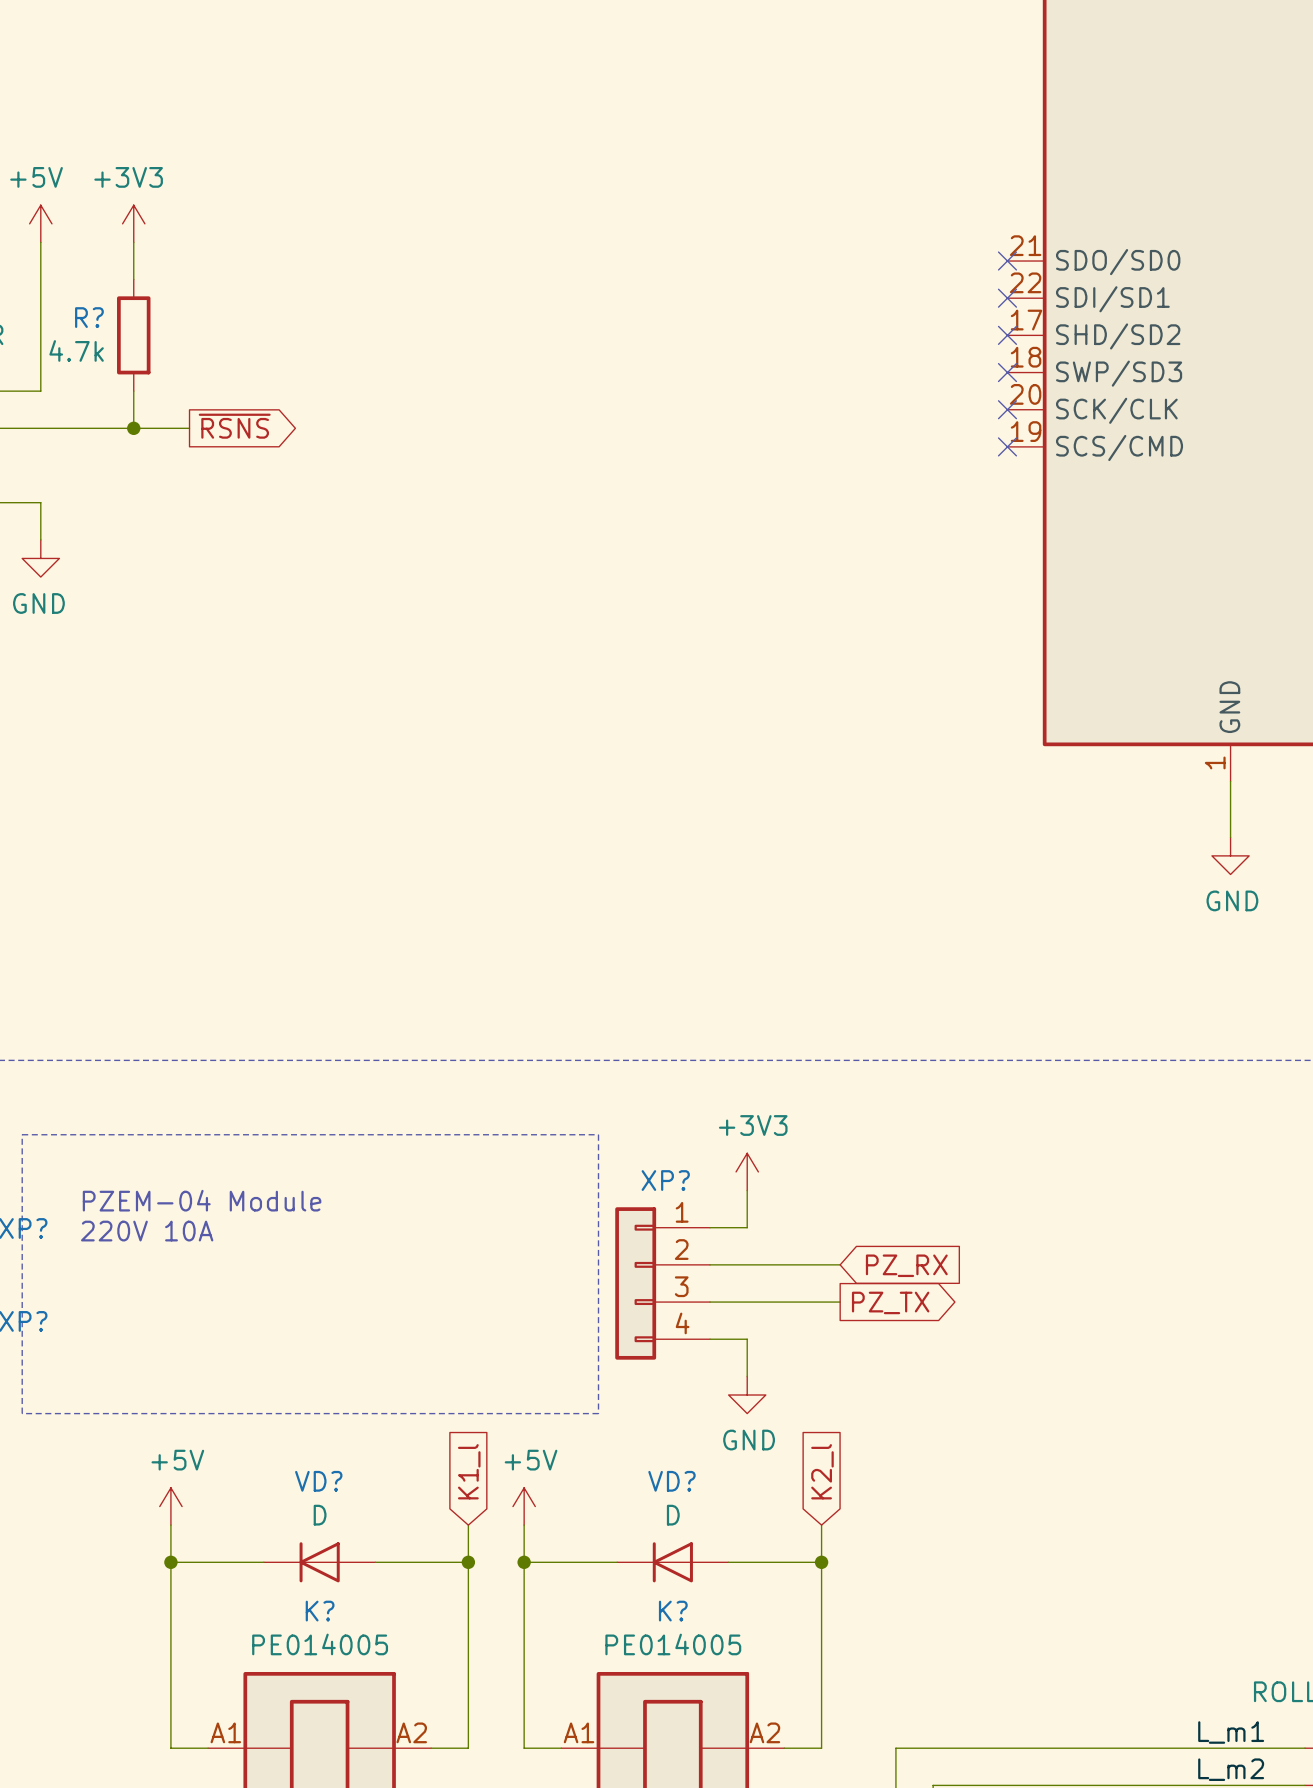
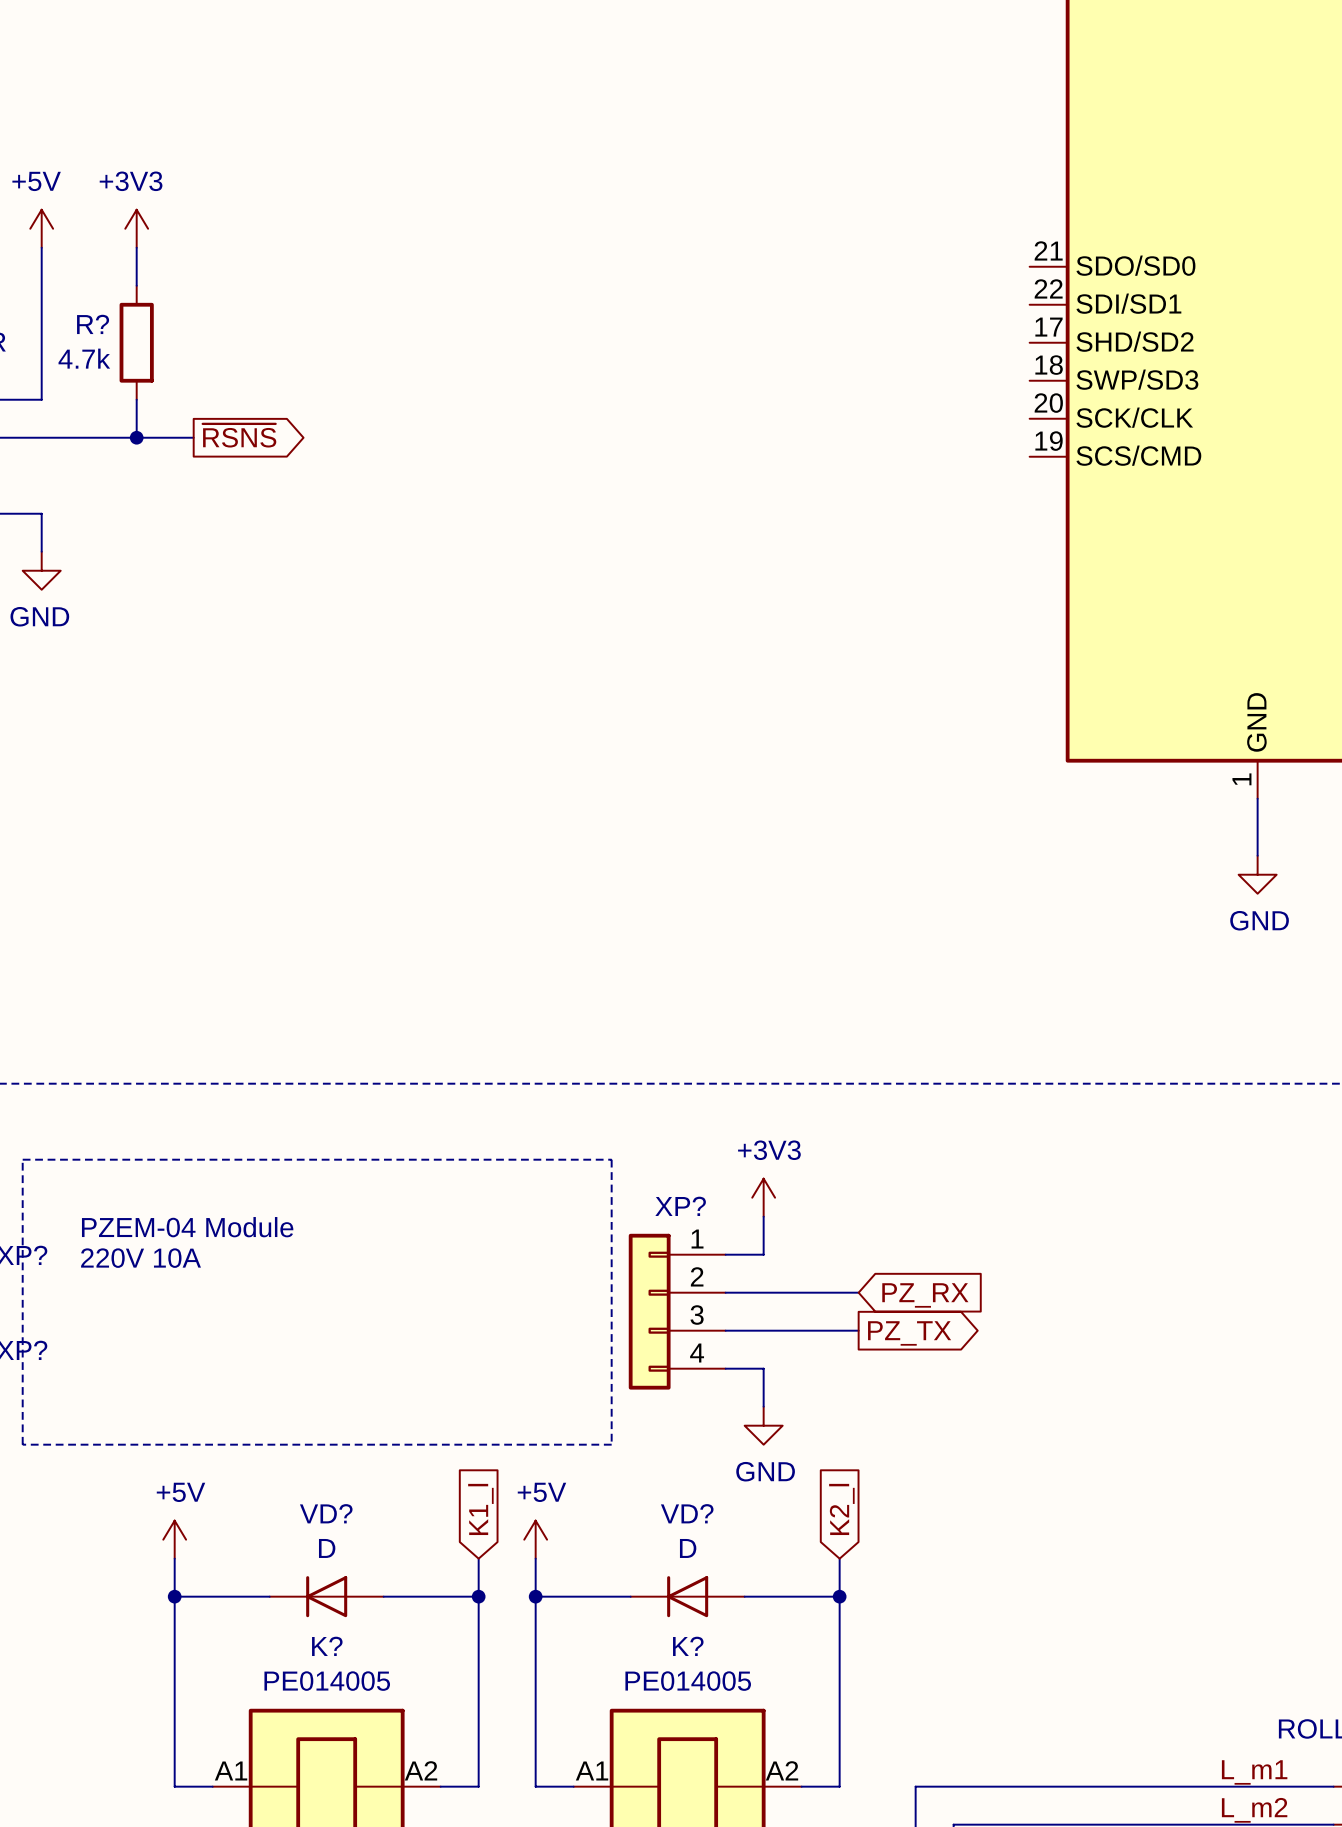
no-connect mark: (1007, 261) -> none
no-connect mark: (1007, 298) -> none
no-connect mark: (1007, 335) -> none
no-connect mark: (1007, 372) -> none
no-connect mark: (1007, 409) -> none
no-connect mark: (1007, 446) -> none

